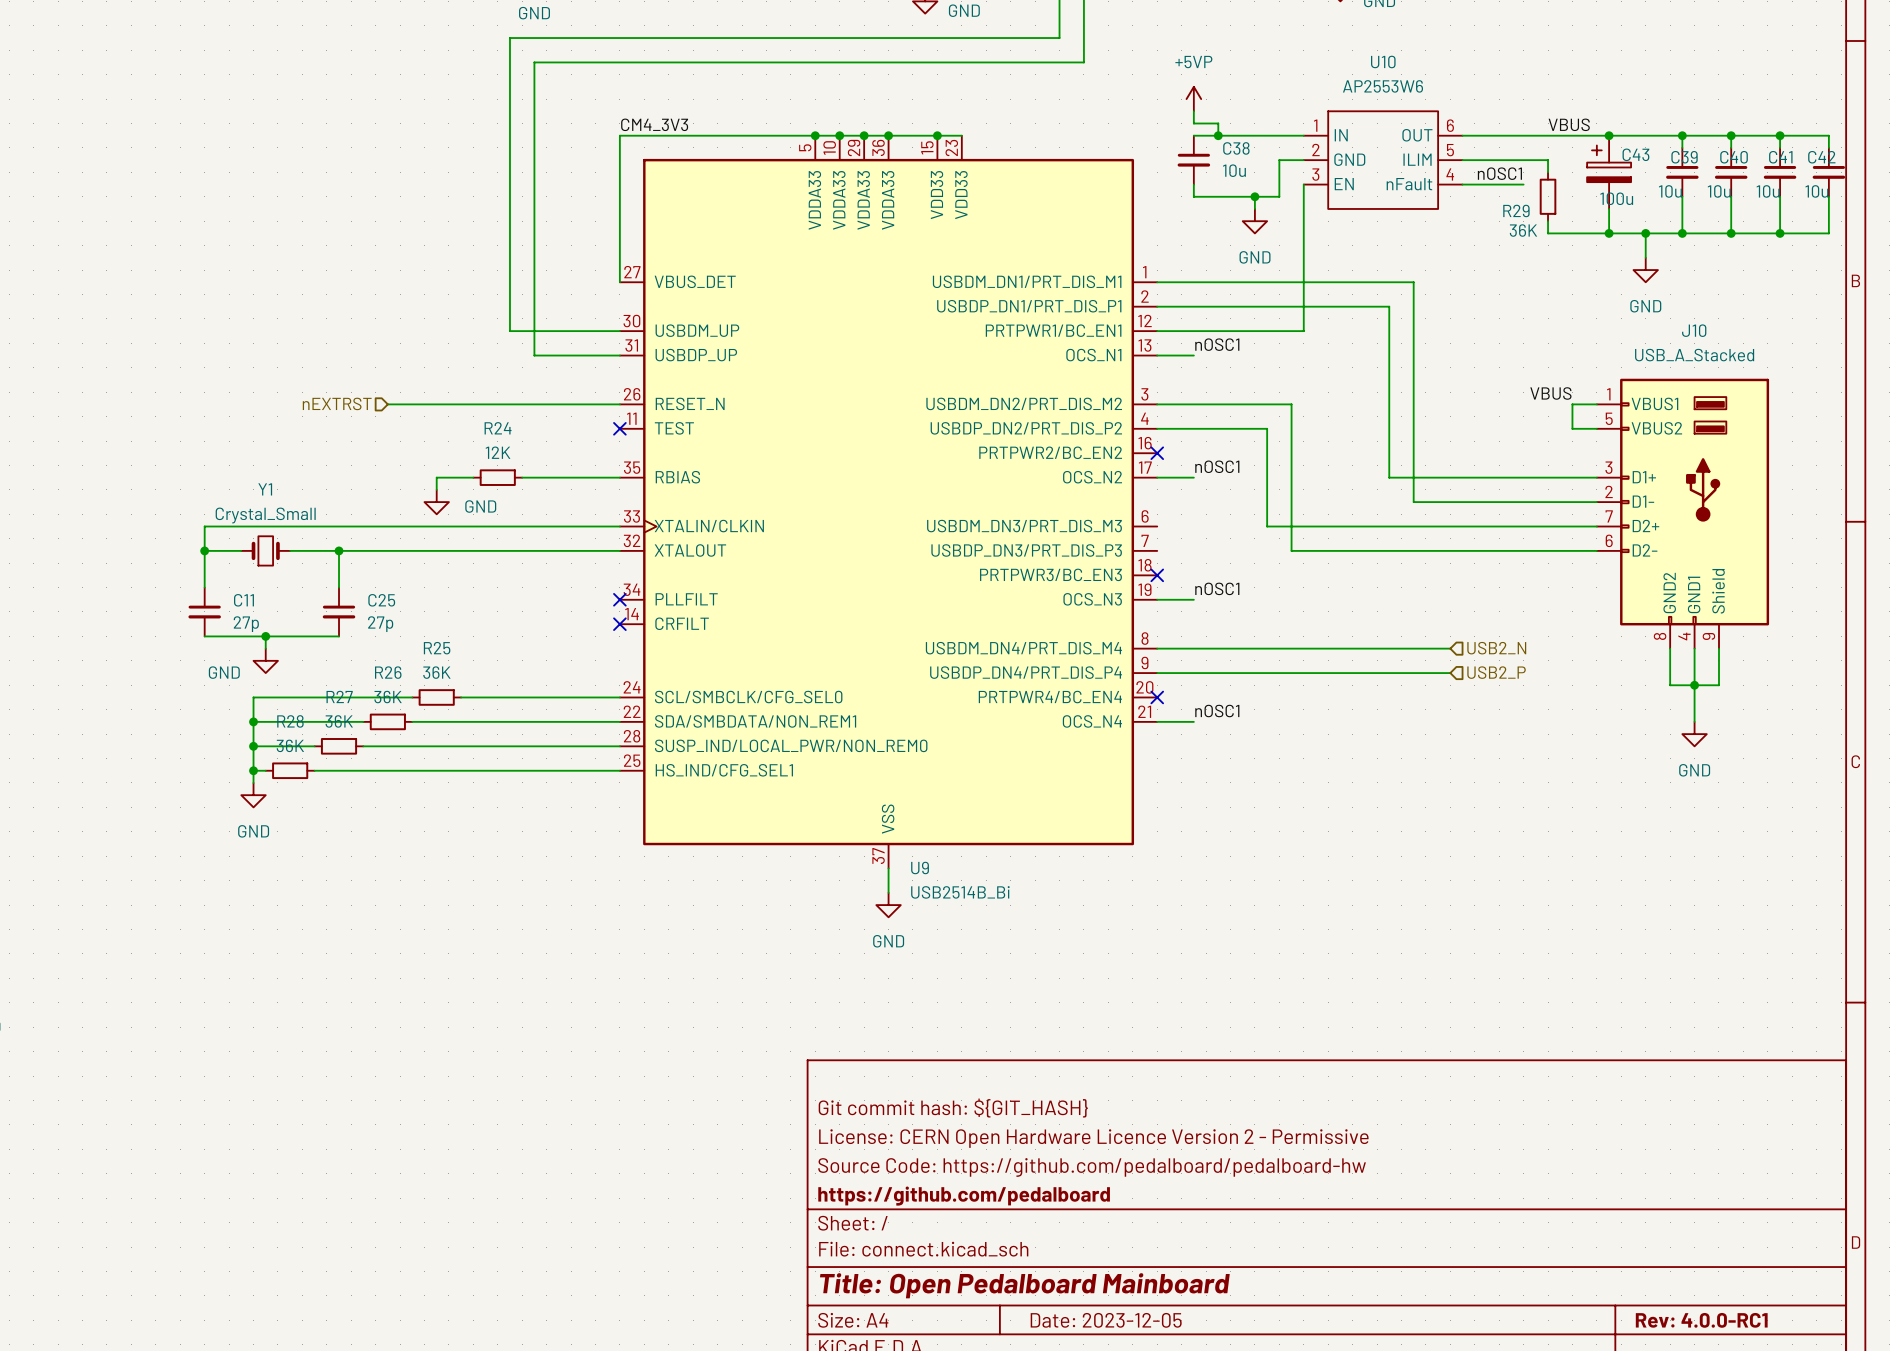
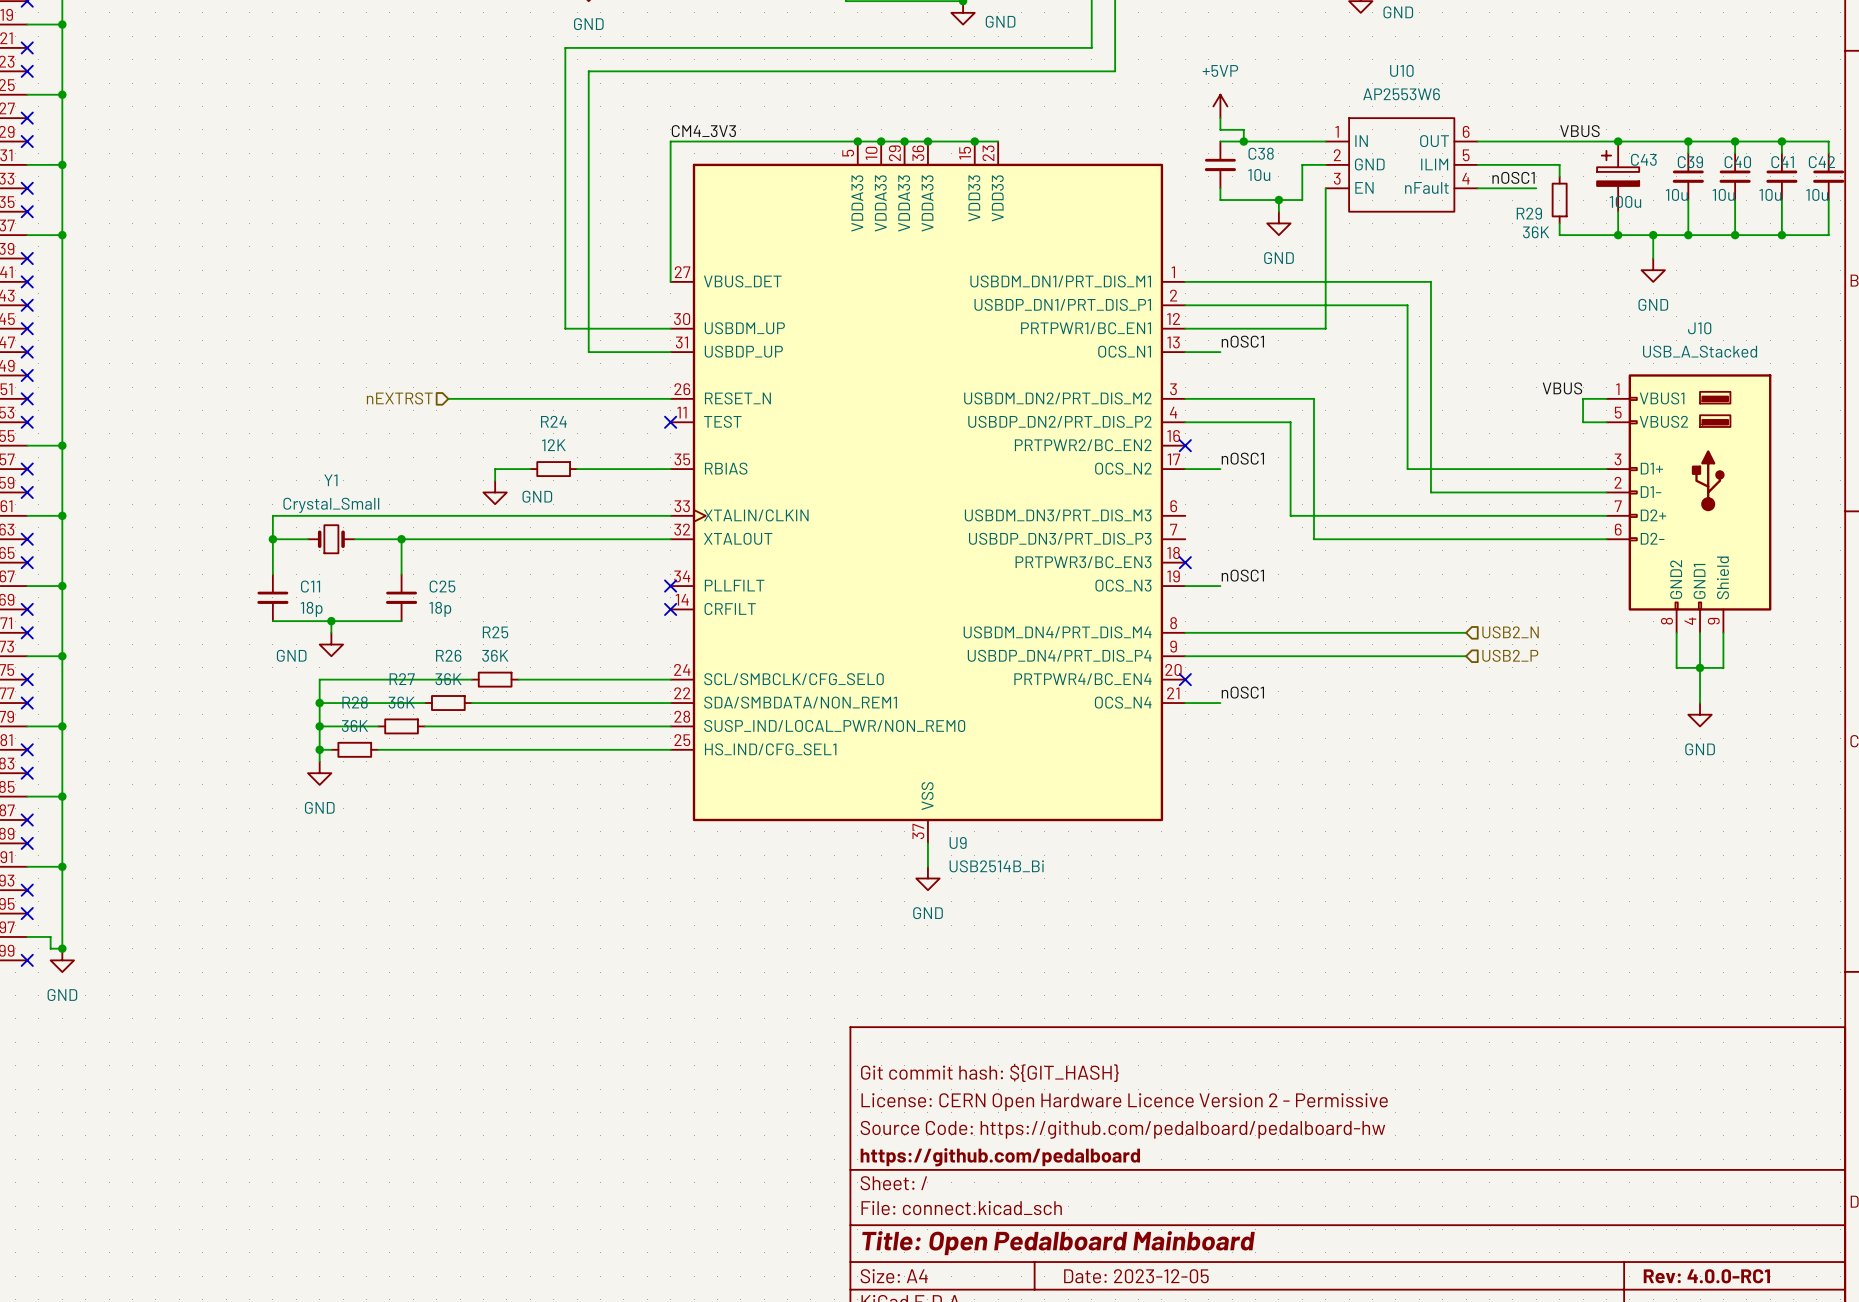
C11 value: 27p (246, 624) -> 18p (311, 609)
C25 value: 27p (380, 624) -> 18p (440, 609)

